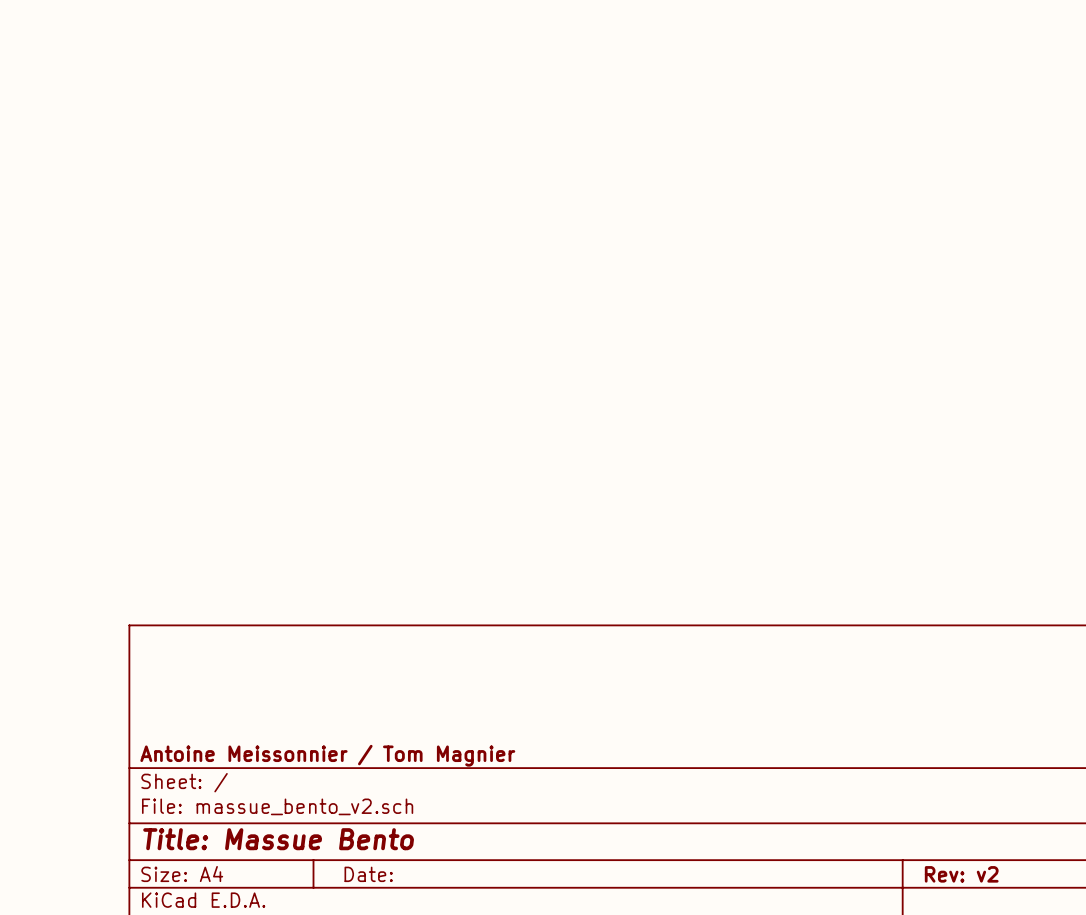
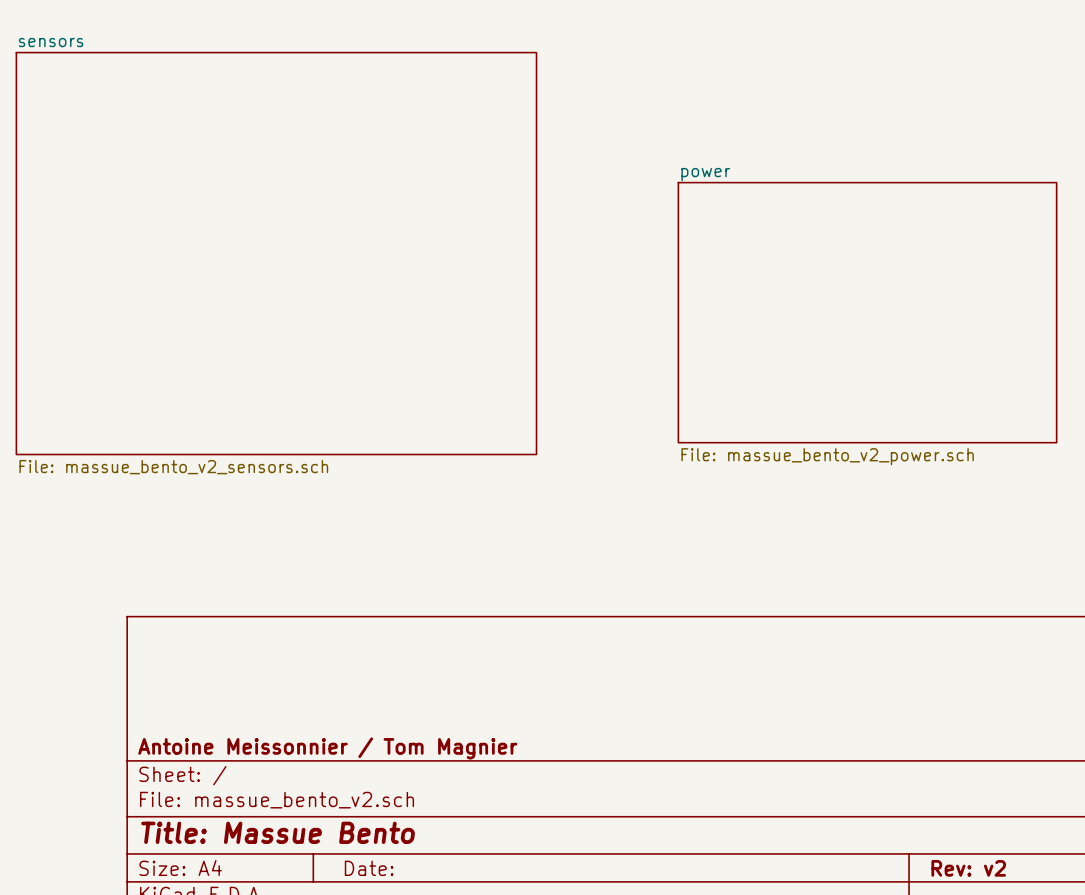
sheet sensors: none -> File: massue_bento_v2_sensors.sch (276, 253)
sheet power: none -> File: massue_bento_v2_power.sch (867, 312)

